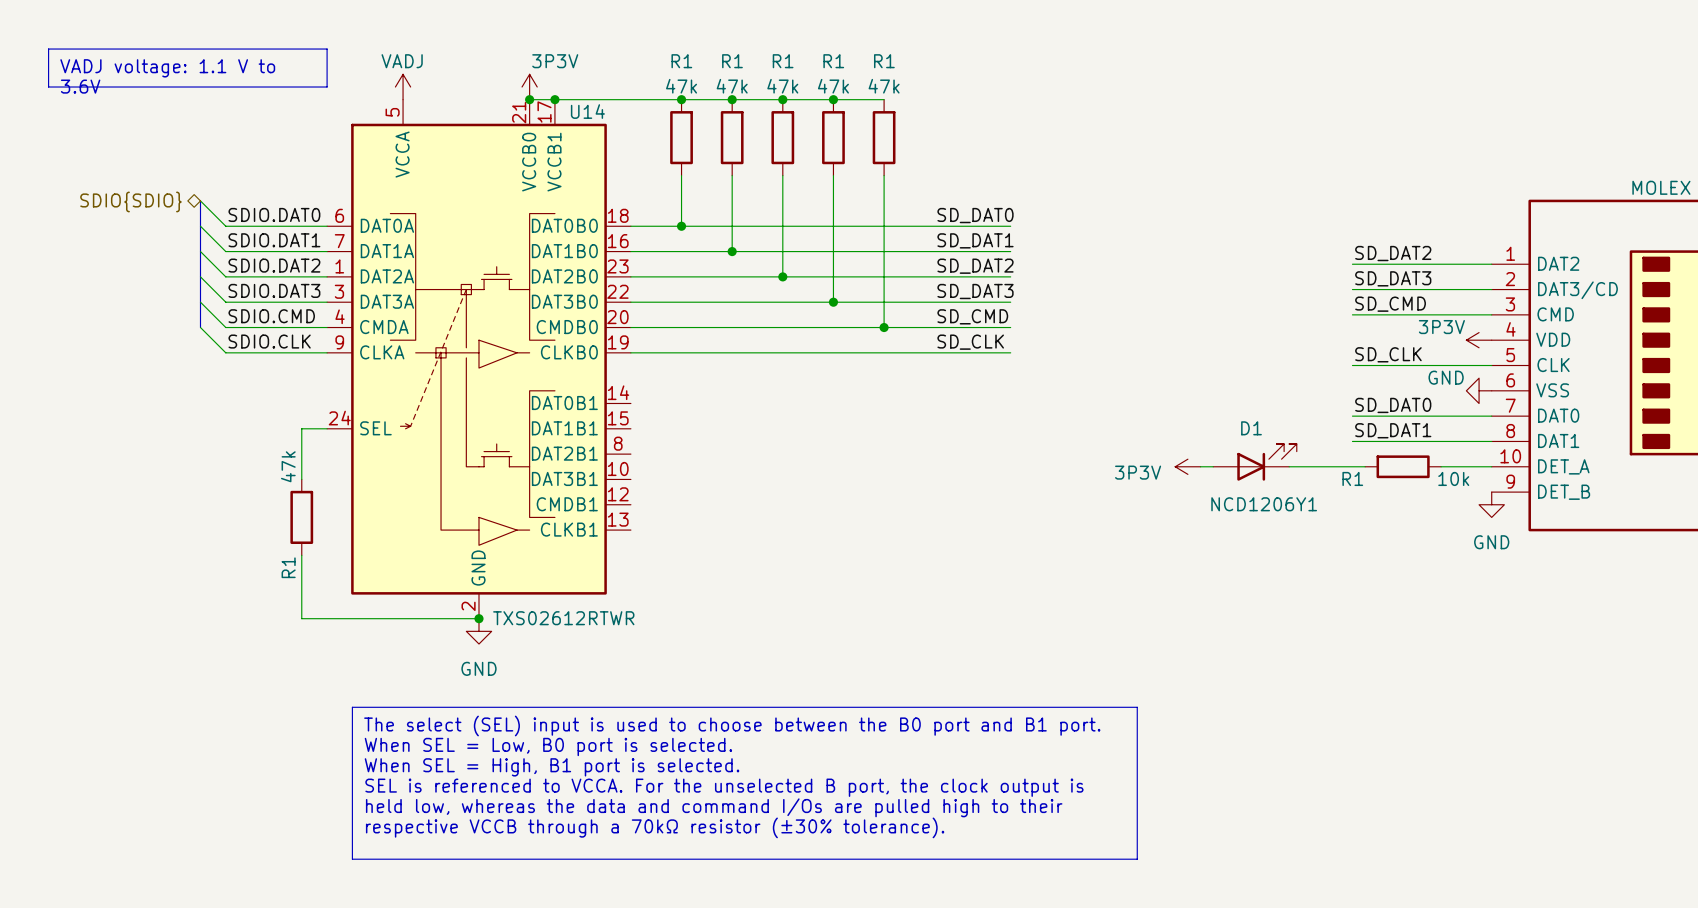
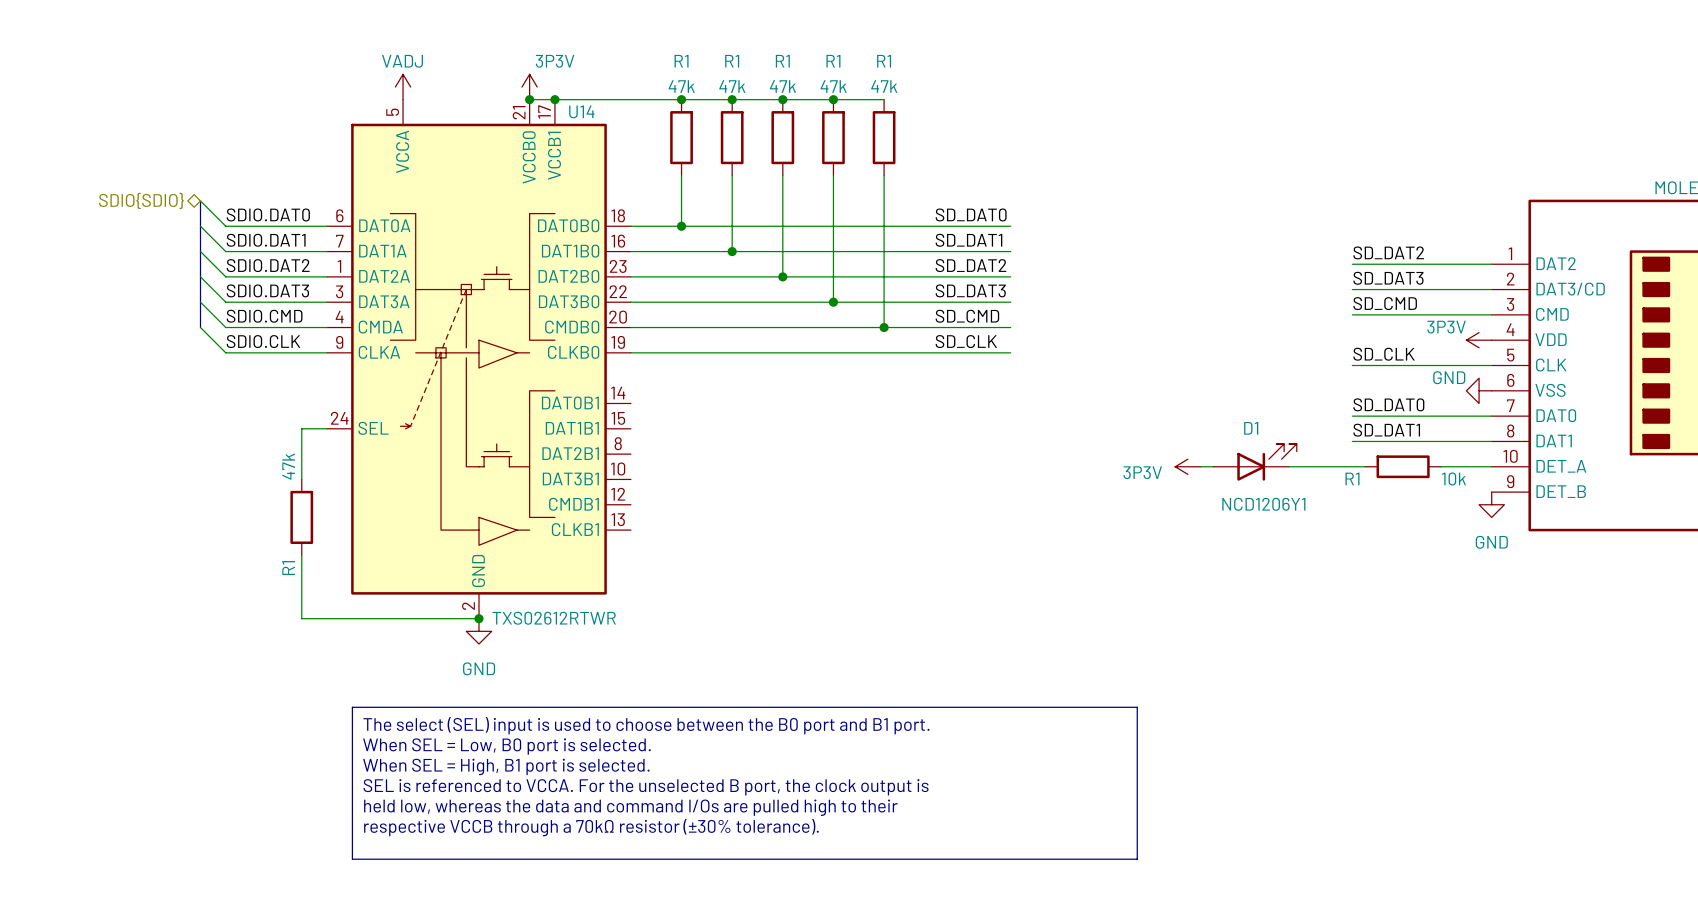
line: (48, 49) (327, 49) (327, 87) (48, 87) (48, 49) -> none
text: VADJ voltage: 1.1 V to (167, 68) -> none
text: 3.6V (80, 86) -> none

